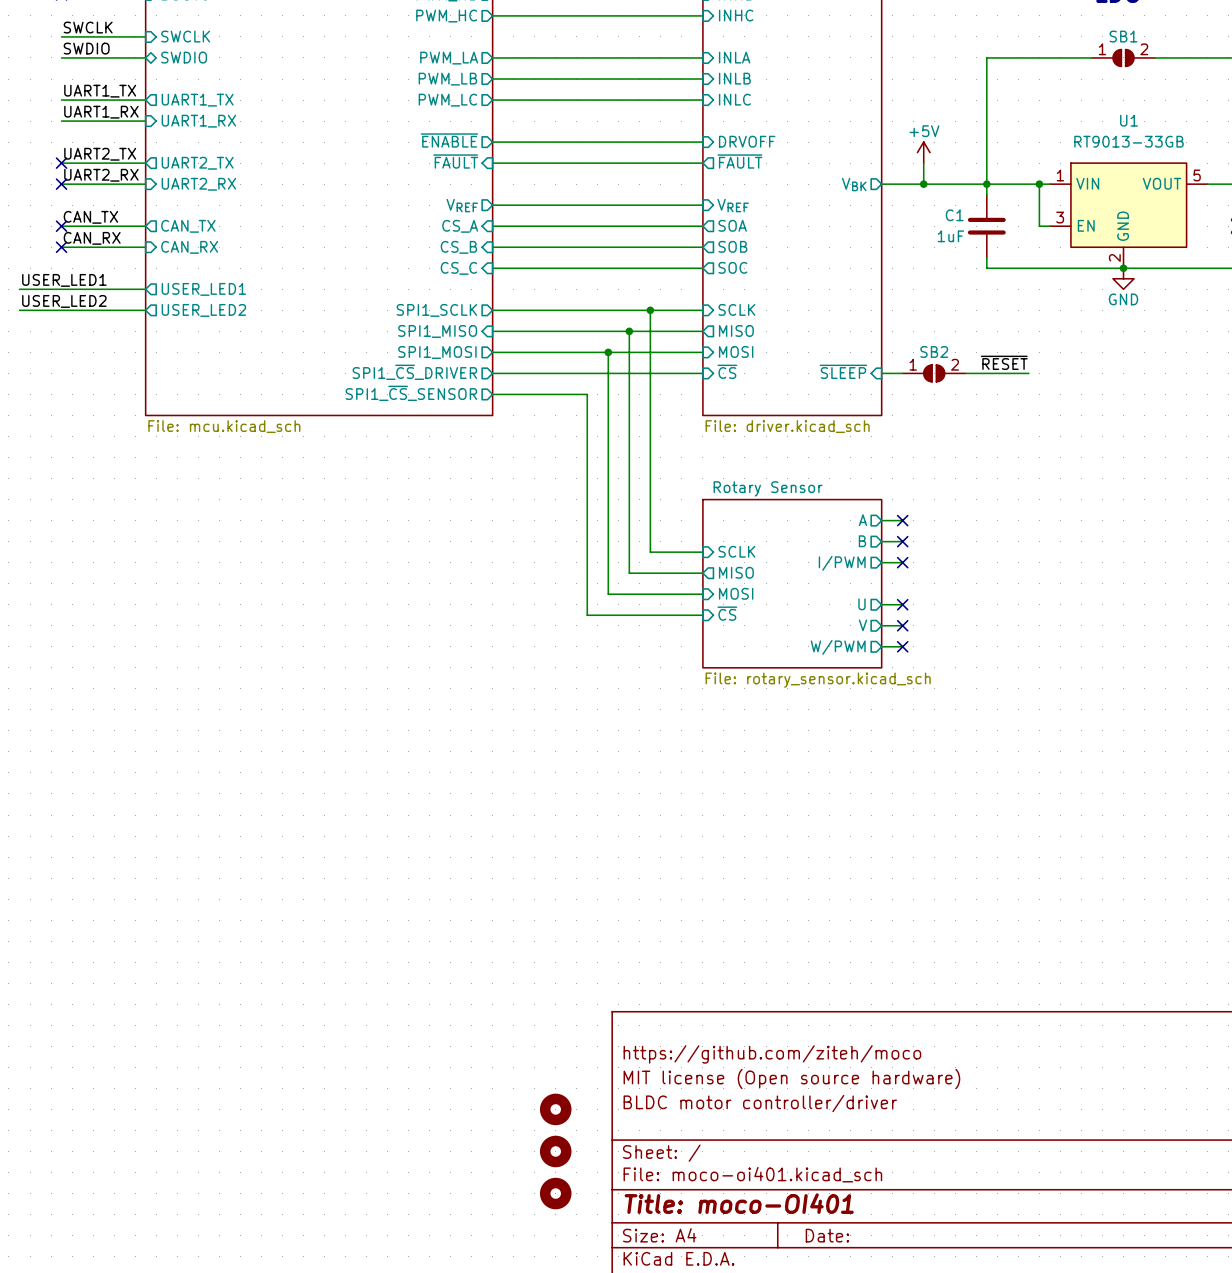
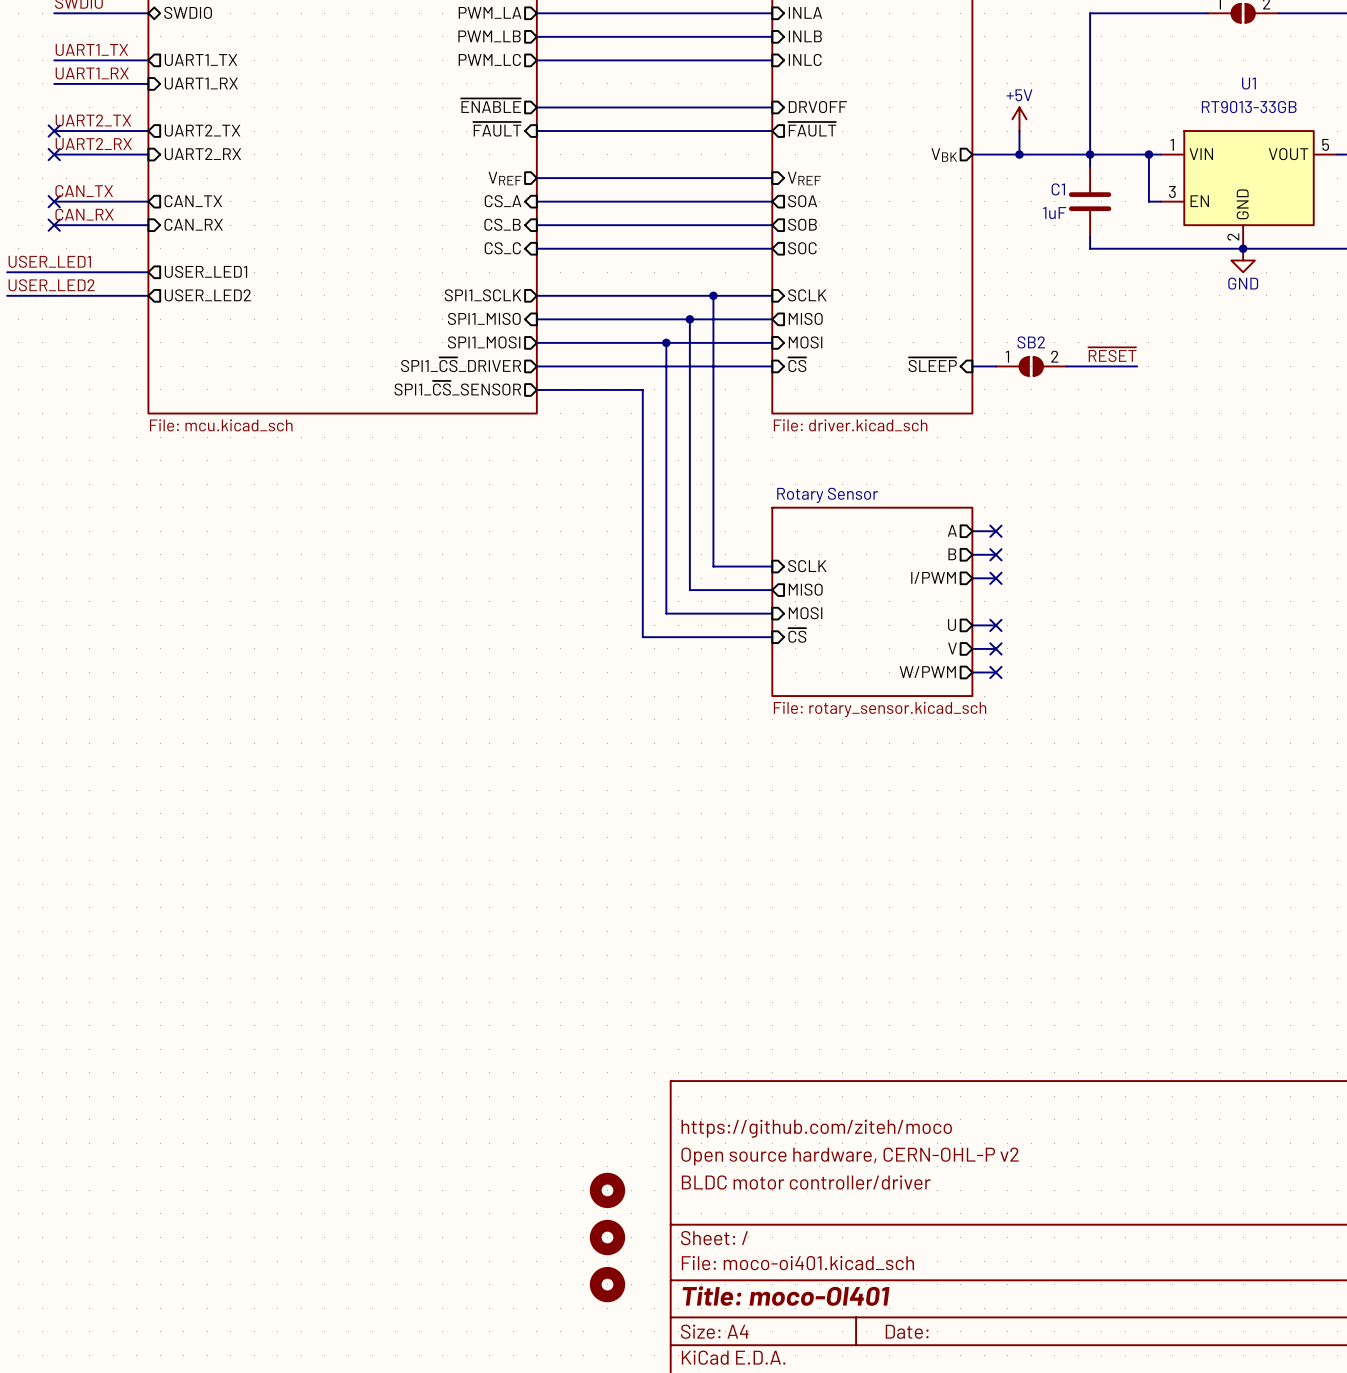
title block: MIT license (Open source hardware) (791, 1078) -> Open source hardware, CERN-OHL-P v2 (850, 1156)

